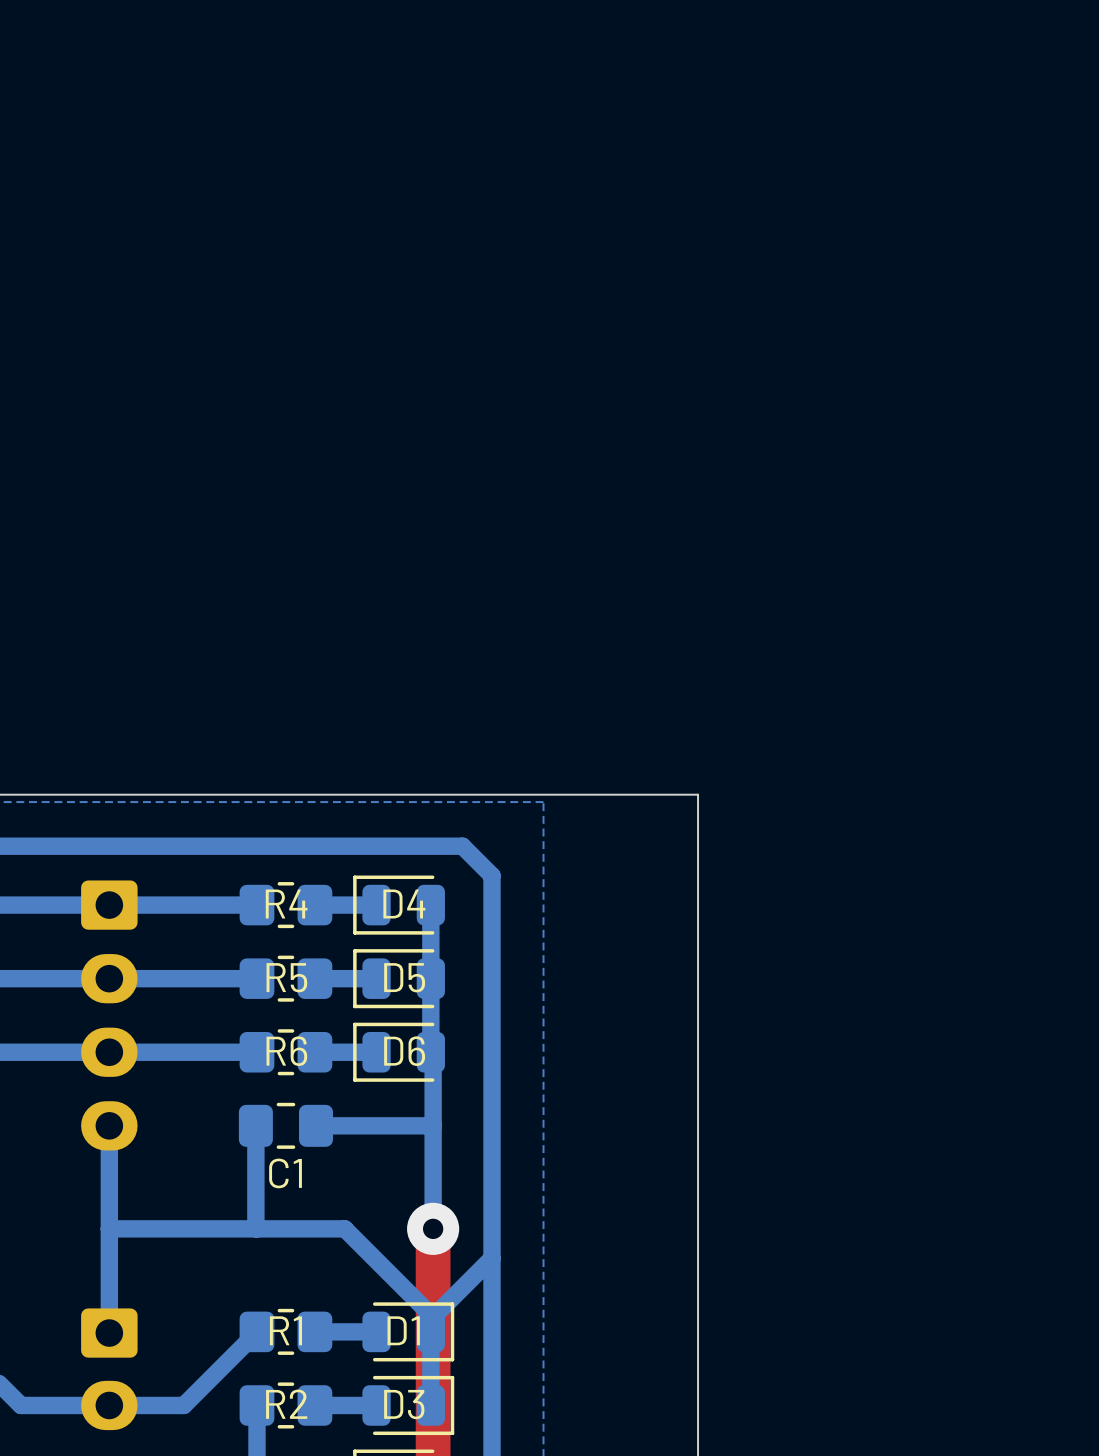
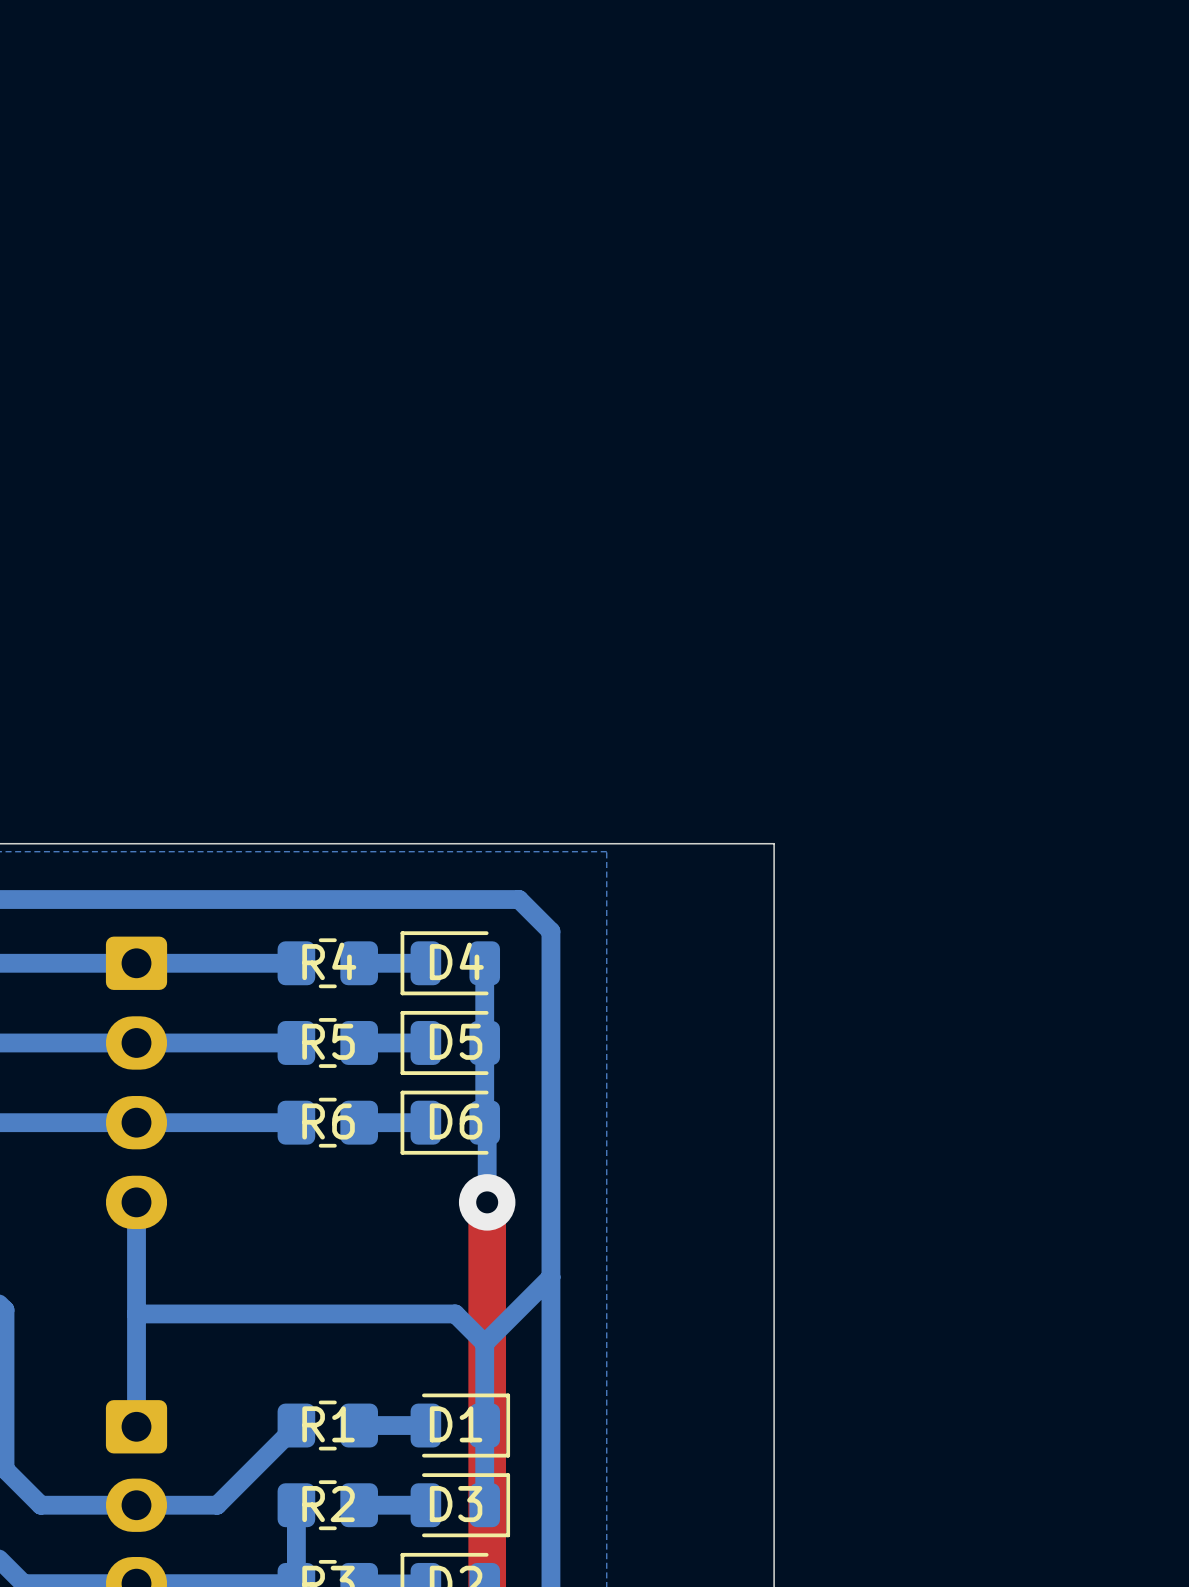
bottom track: (433, 1117) (433, 1231) -> none
bottom track: (255, 1125) (256, 1228) -> none
C1: (285, 1125) -> none
bottom track: (433, 1125) (316, 1125) -> none
top track: none -> (487, 1202) (487, 1313)
bottom track: none -> (550, 1277) (484, 1343)
bottom track: (344, 1228) (430, 1314) -> (391, 1313) (455, 1313) (484, 1343)
via position: (433, 1228) -> (487, 1202)
bottom track: none -> (484, 1343) (484, 1407)
bottom track: (491, 1258) (433, 1317) -> none

